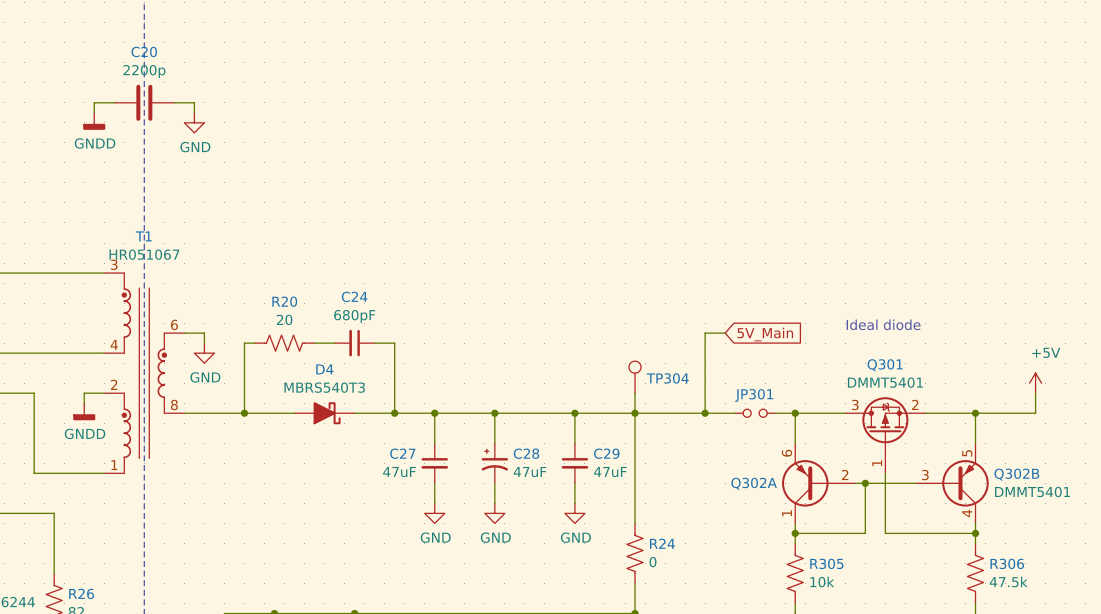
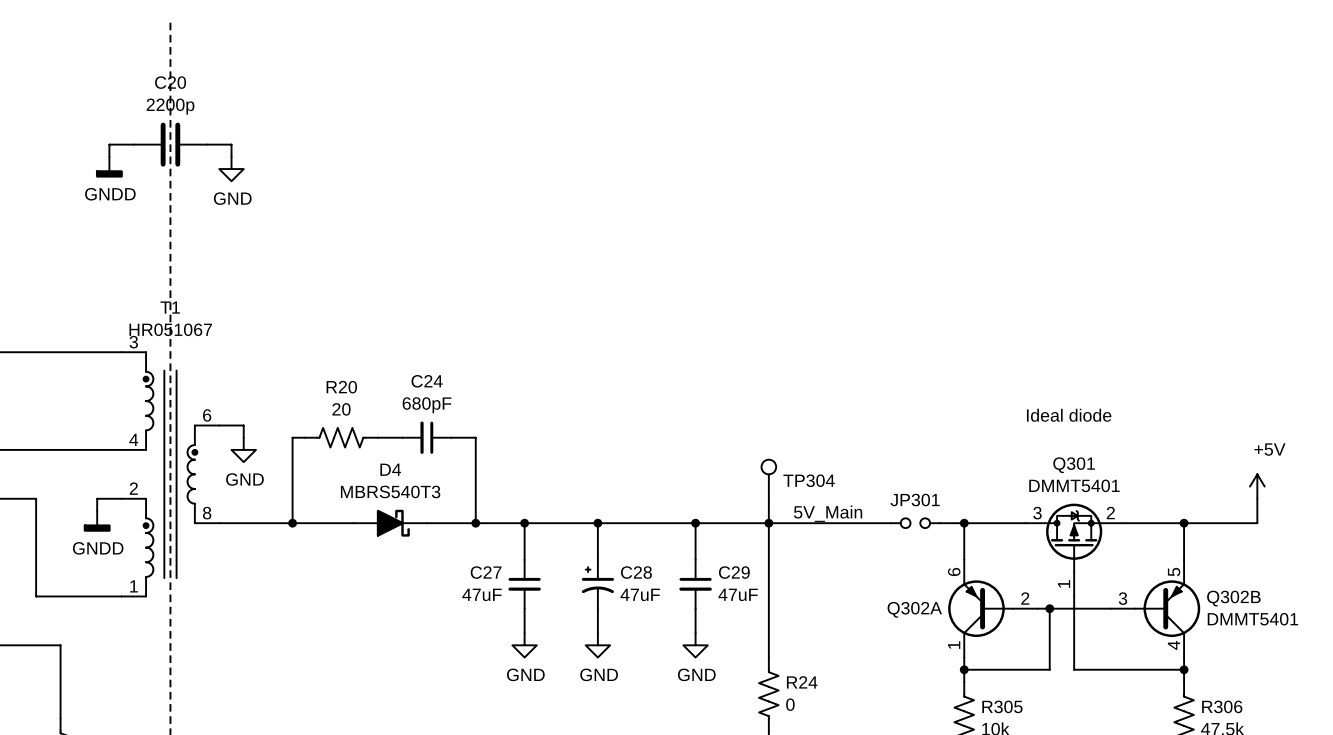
wire: (725, 333) (705, 333) (705, 413) -> none
global label: 5V_Main (765, 334) -> none
label: none -> 5V_Main (828, 513)
junction: (705, 413) -> none

